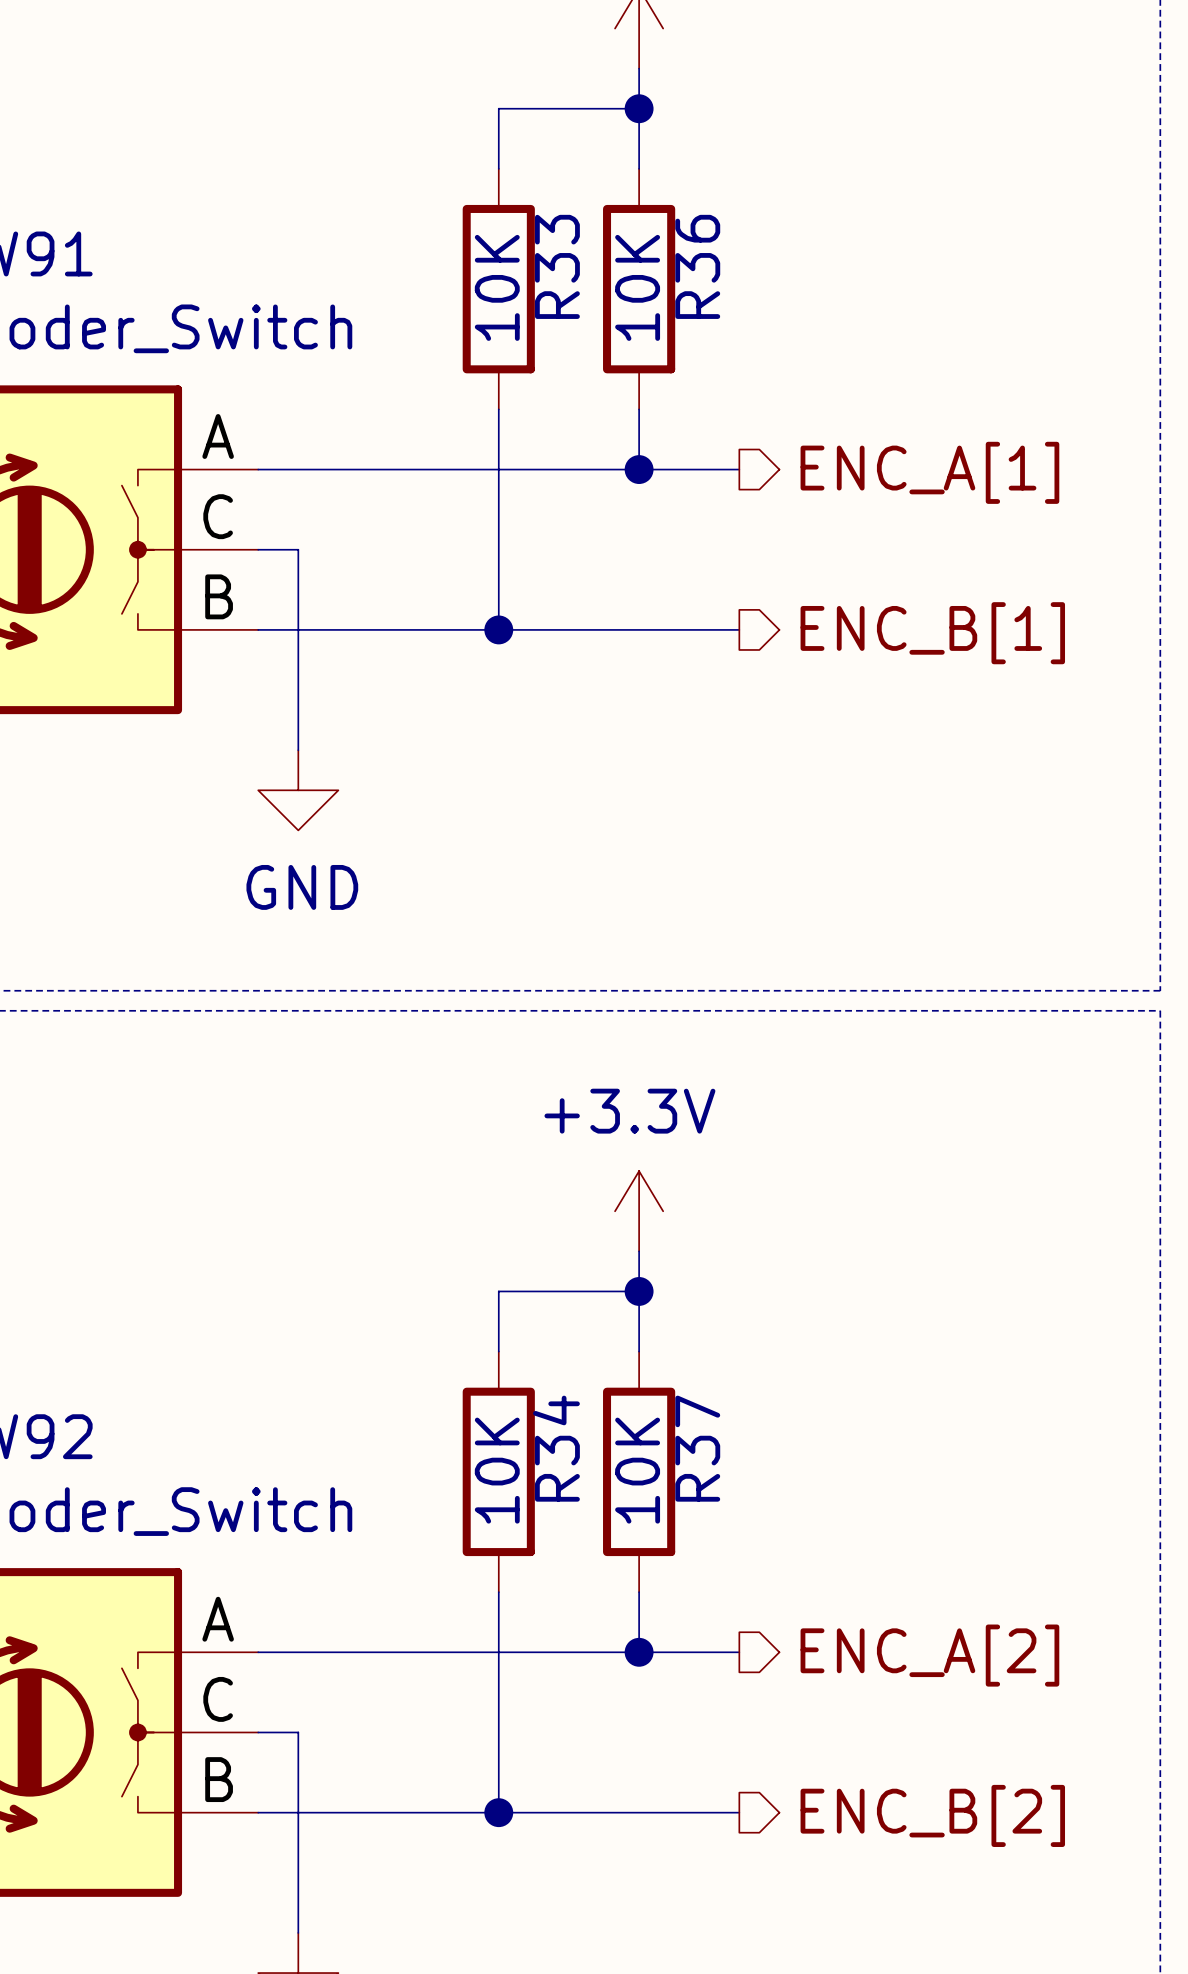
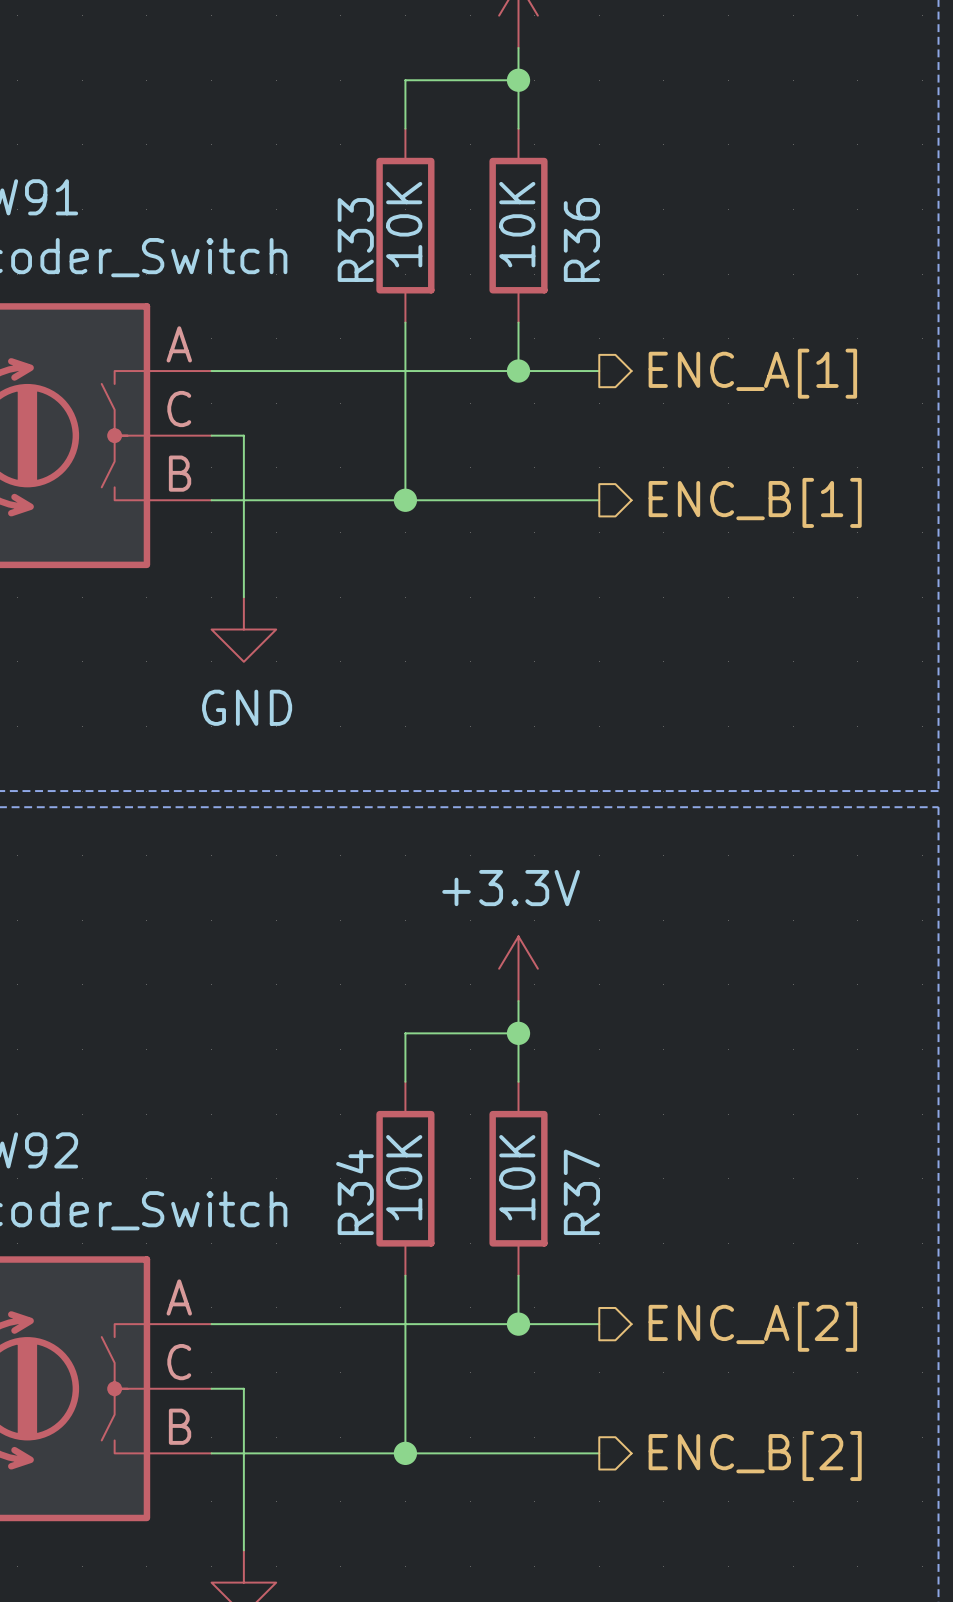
R33 name position: R33 (557, 266) -> R33 (355, 240)
R36 name position: R36 (697, 266) -> R36 (581, 240)
R34 name position: R34 (556, 1448) -> R34 (354, 1192)
R37 name position: R37 (697, 1448) -> R37 (581, 1192)

